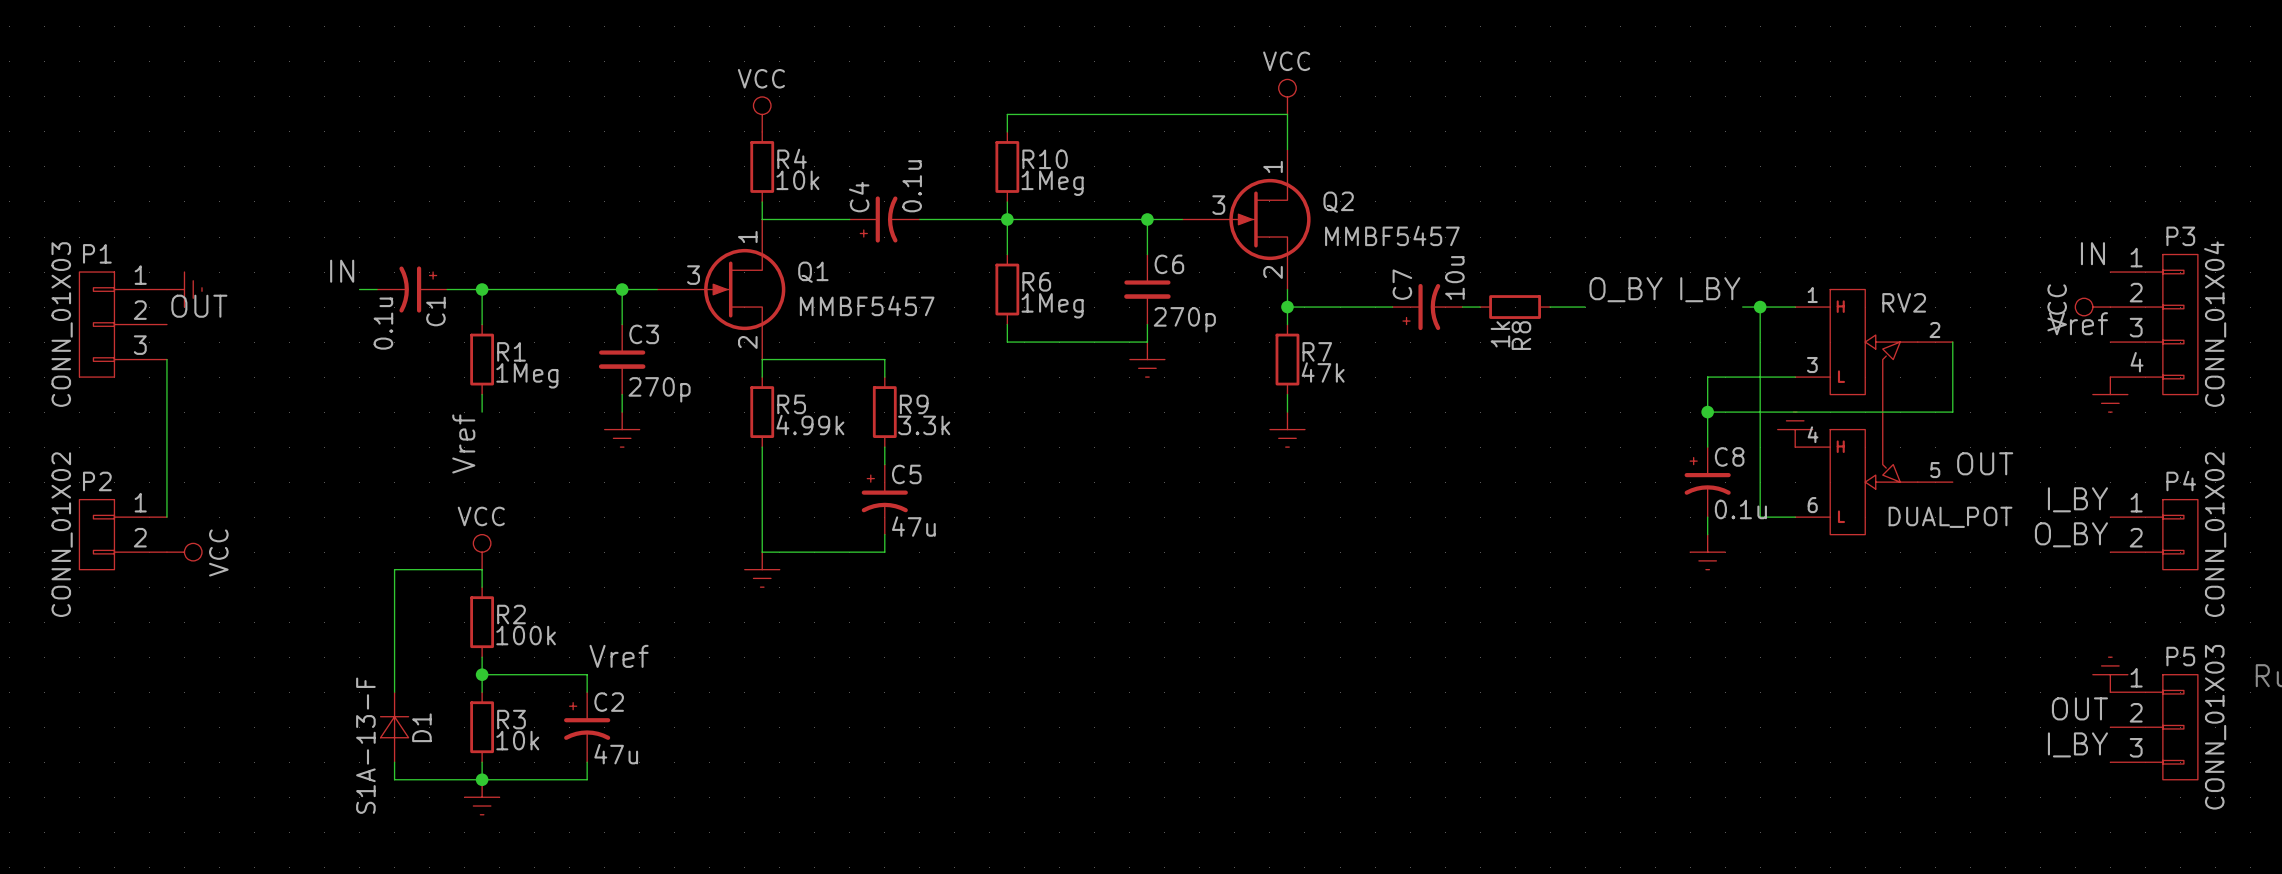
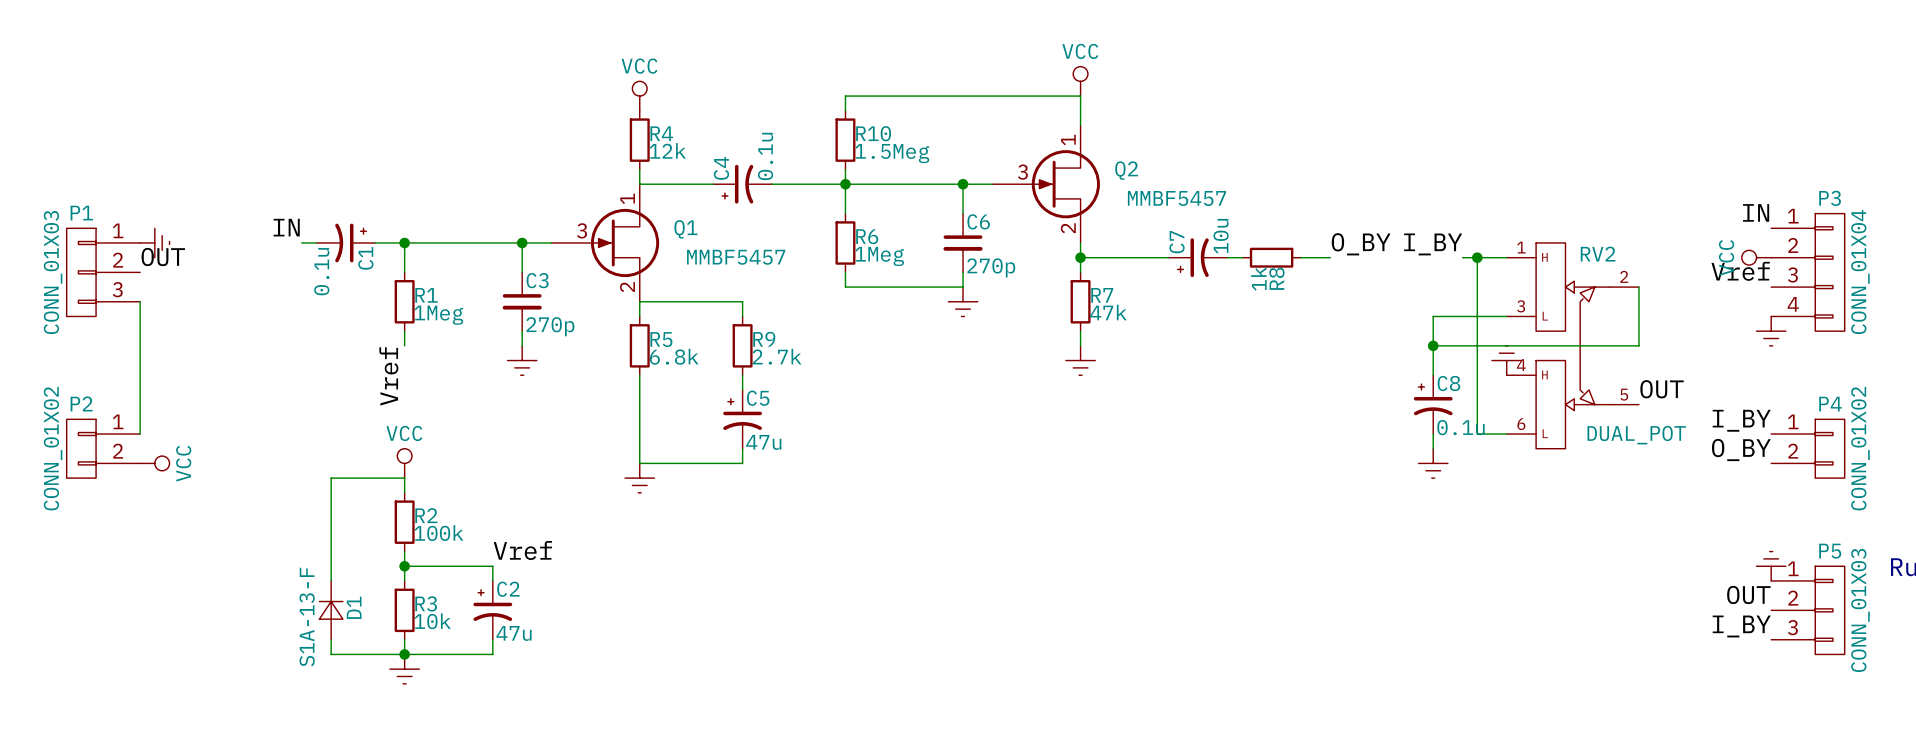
R4 value: 10k (797, 180) -> 12k (667, 150)
R10 value: 1Meg (1052, 183) -> 1.5Meg (892, 153)
R5 value: 4.99k (810, 425) -> 6.8k (674, 356)
R9 value: 3.3k (924, 425) -> 2.7k (777, 356)

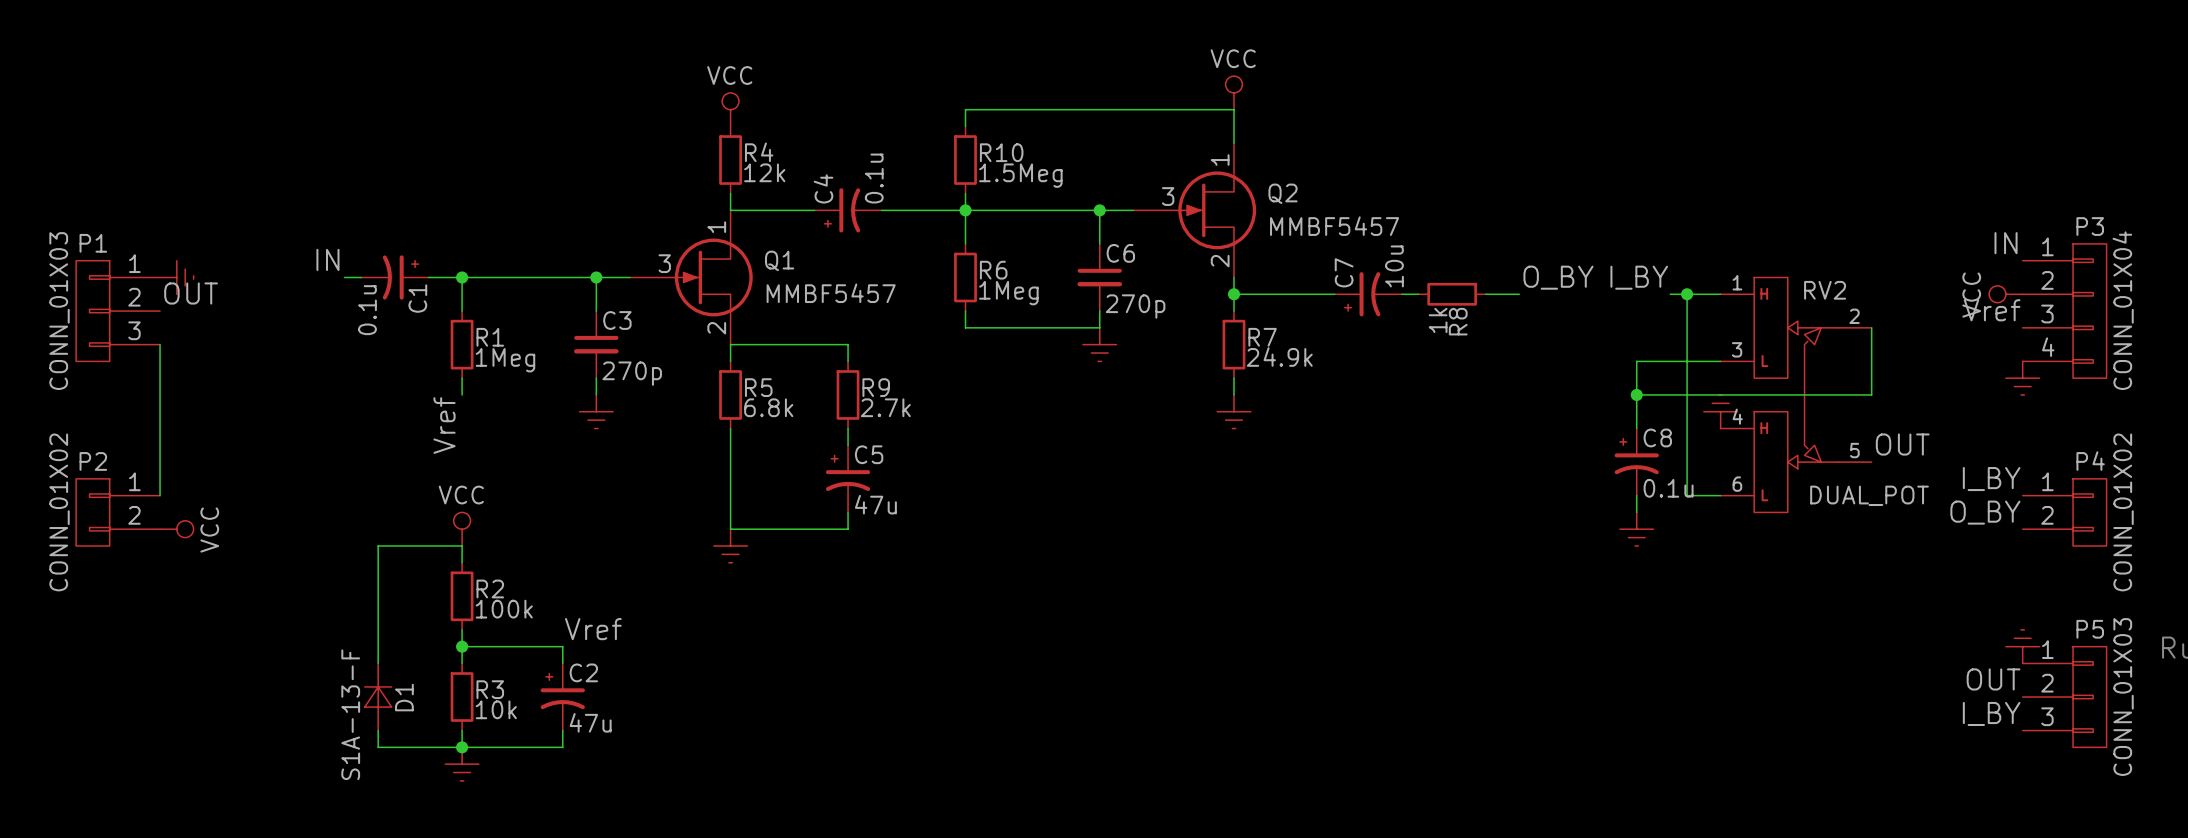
R7 value: 47k (1108, 312) -> 24.9k (1279, 357)

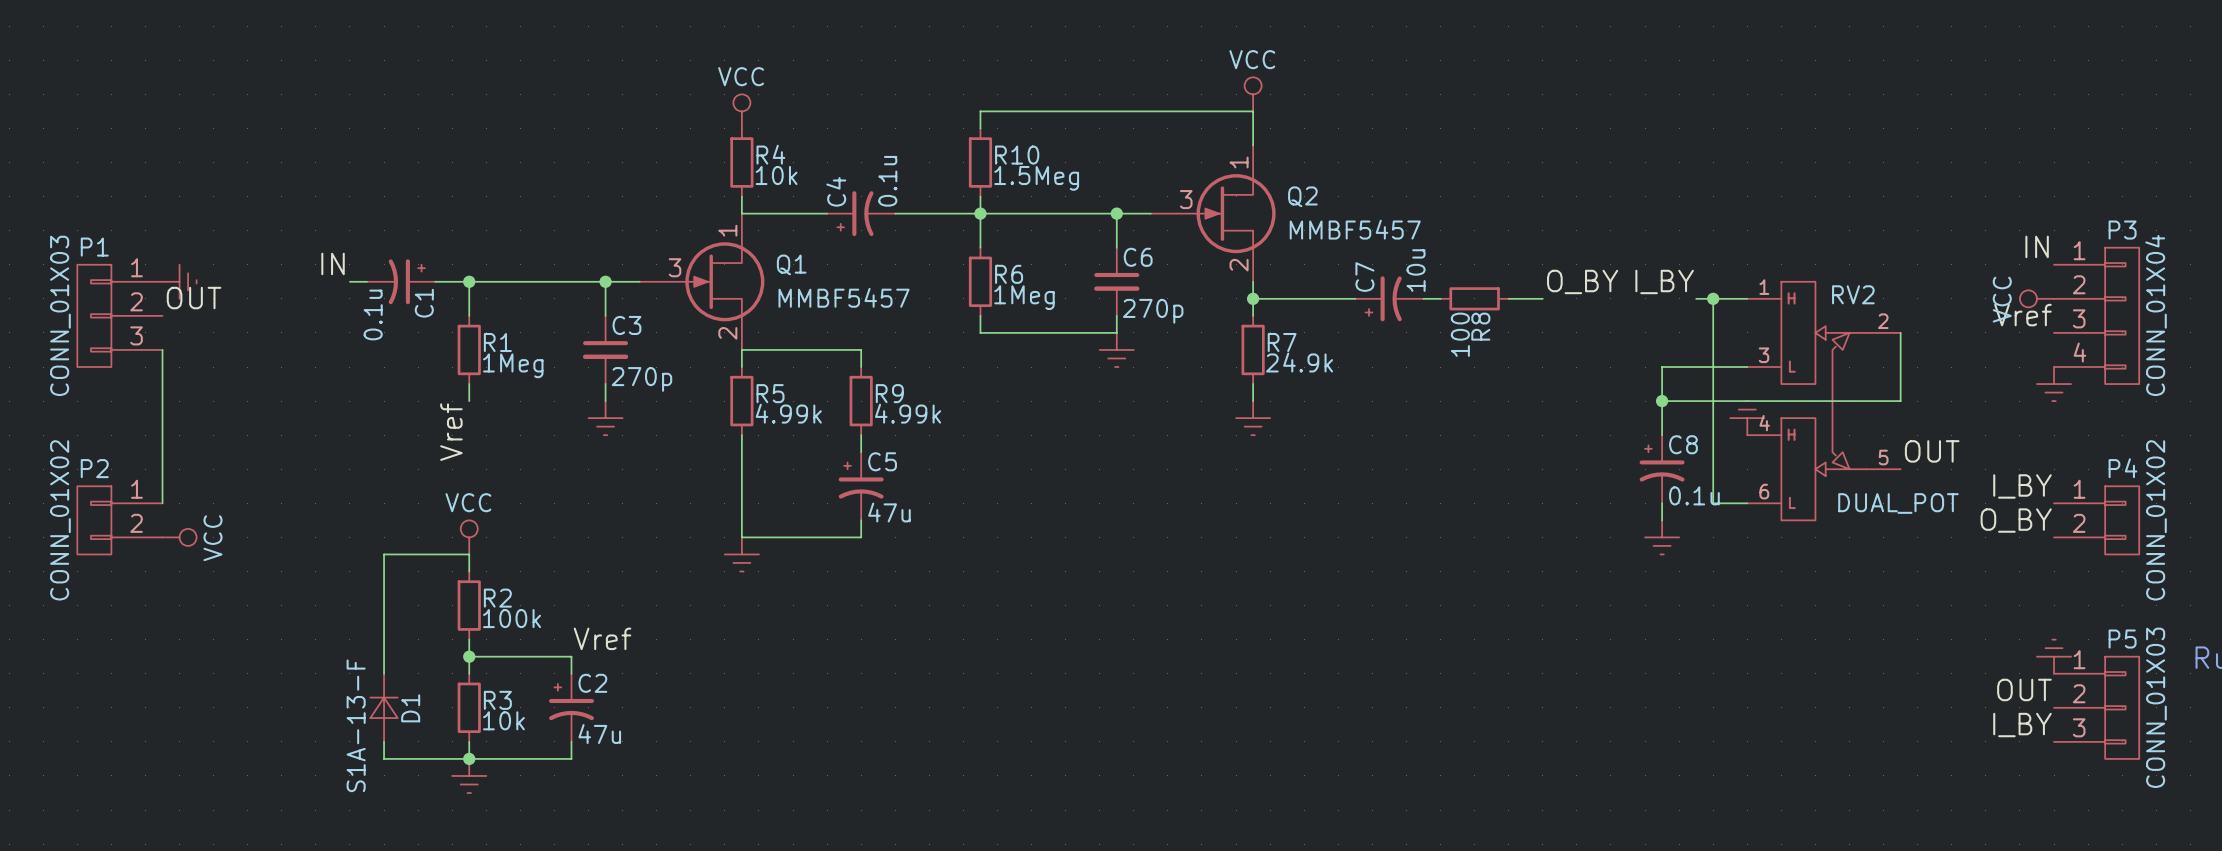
R4 value: 12k (764, 172) -> 10k (776, 175)
R8 value: 1k (1438, 320) -> 100 (1460, 334)
R5 value: 6.8k (768, 407) -> 4.99k (788, 413)
R9 value: 2.7k (885, 407) -> 4.99k (908, 413)

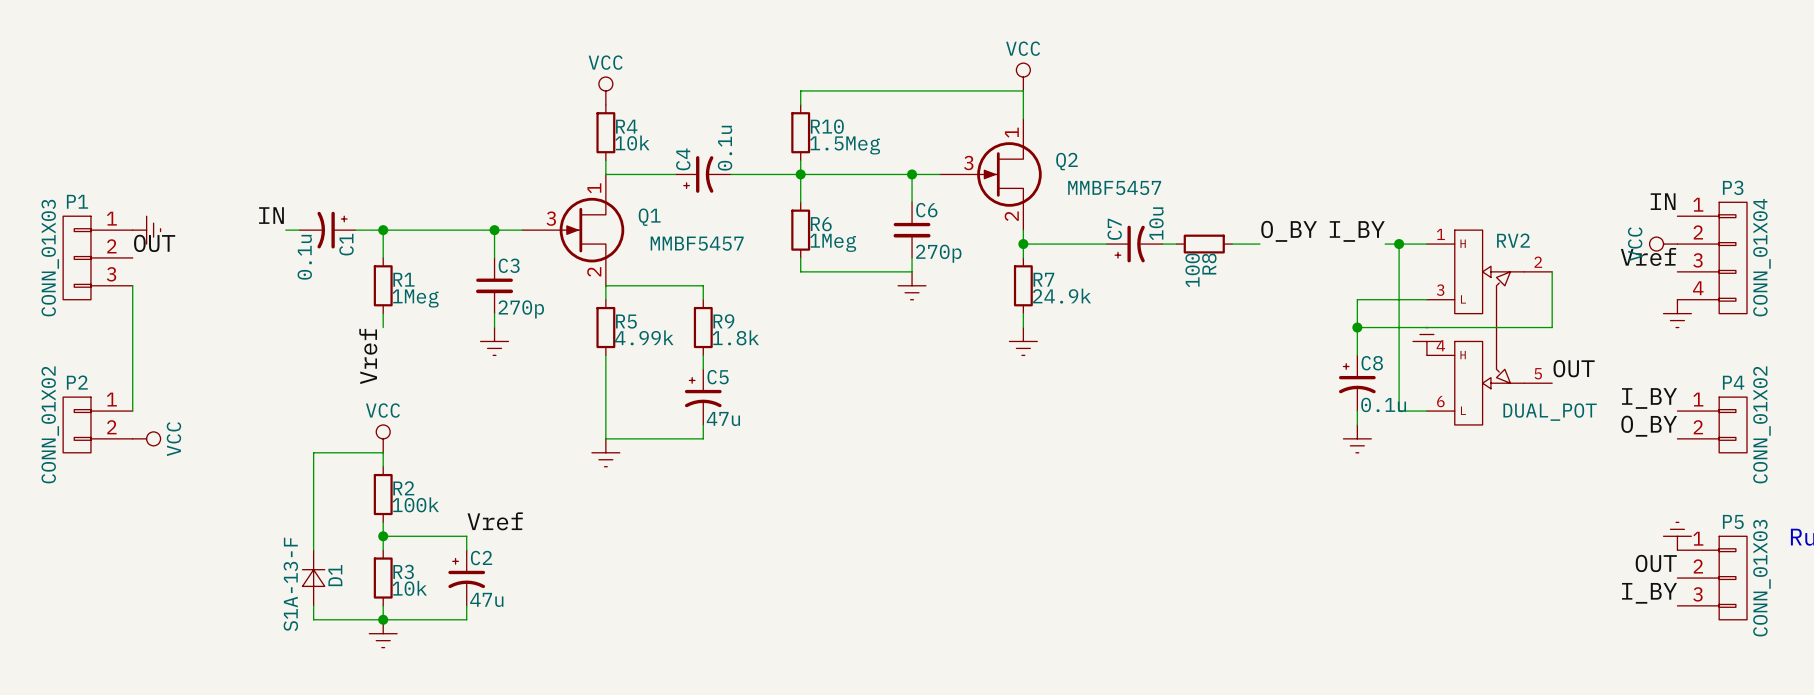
R9 value: 4.99k (908, 413) -> 1.8k (735, 337)

